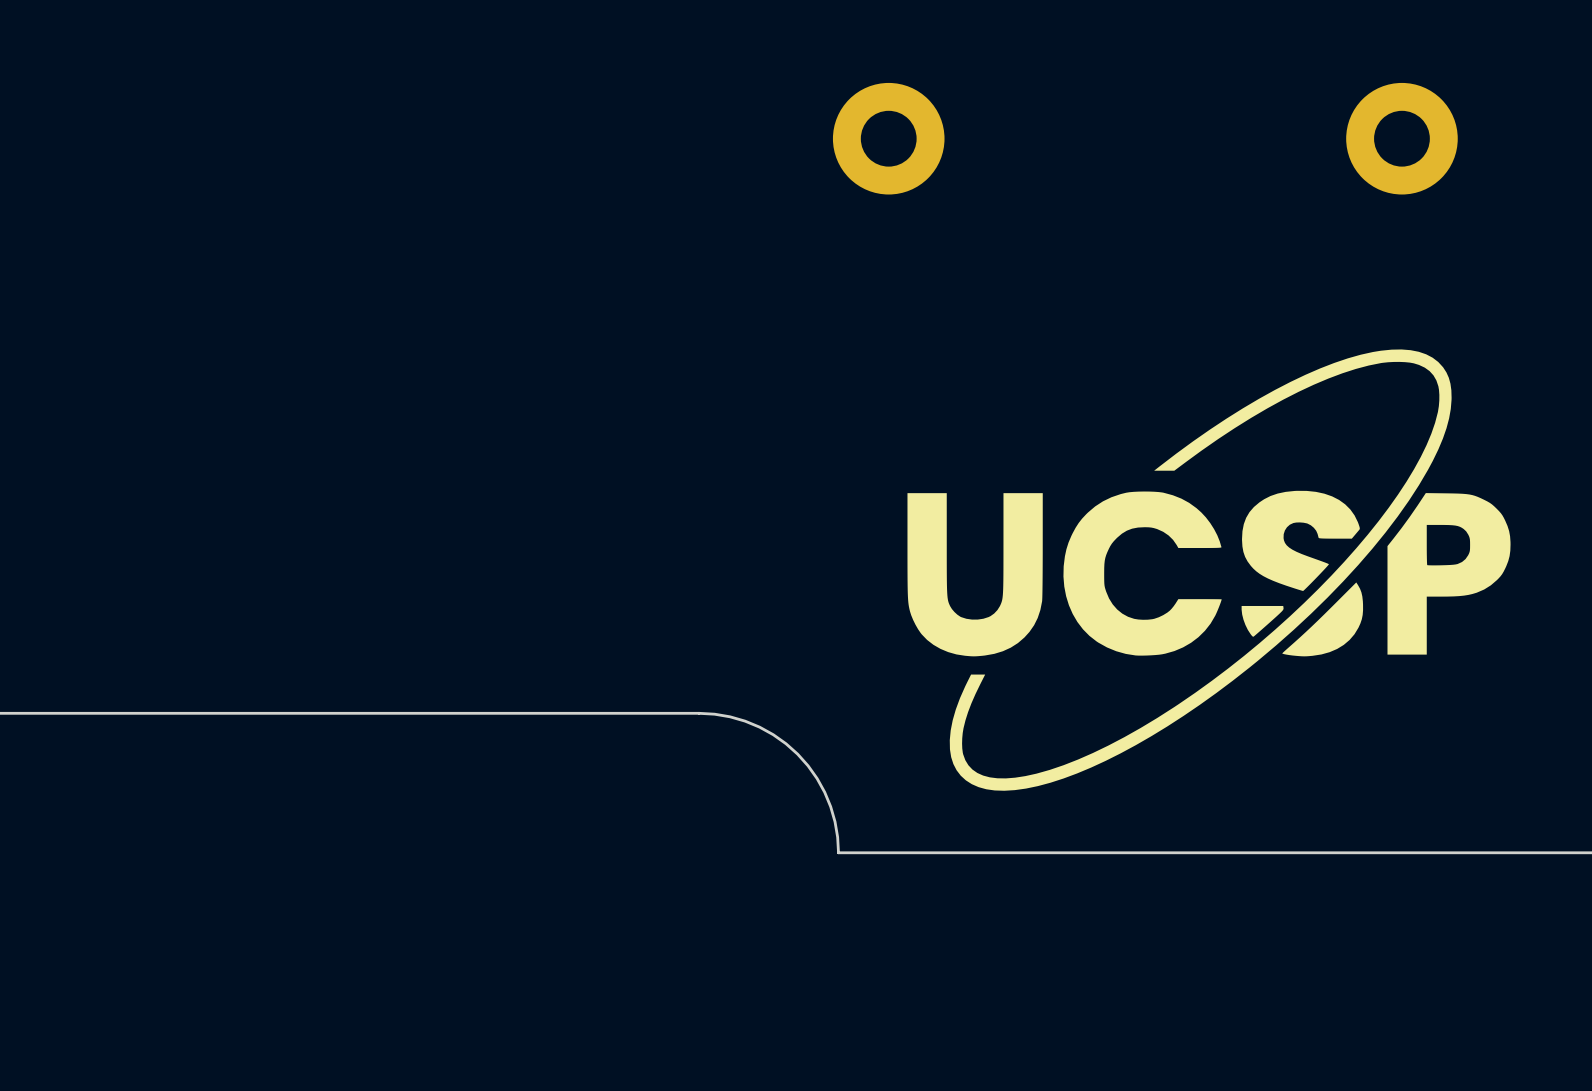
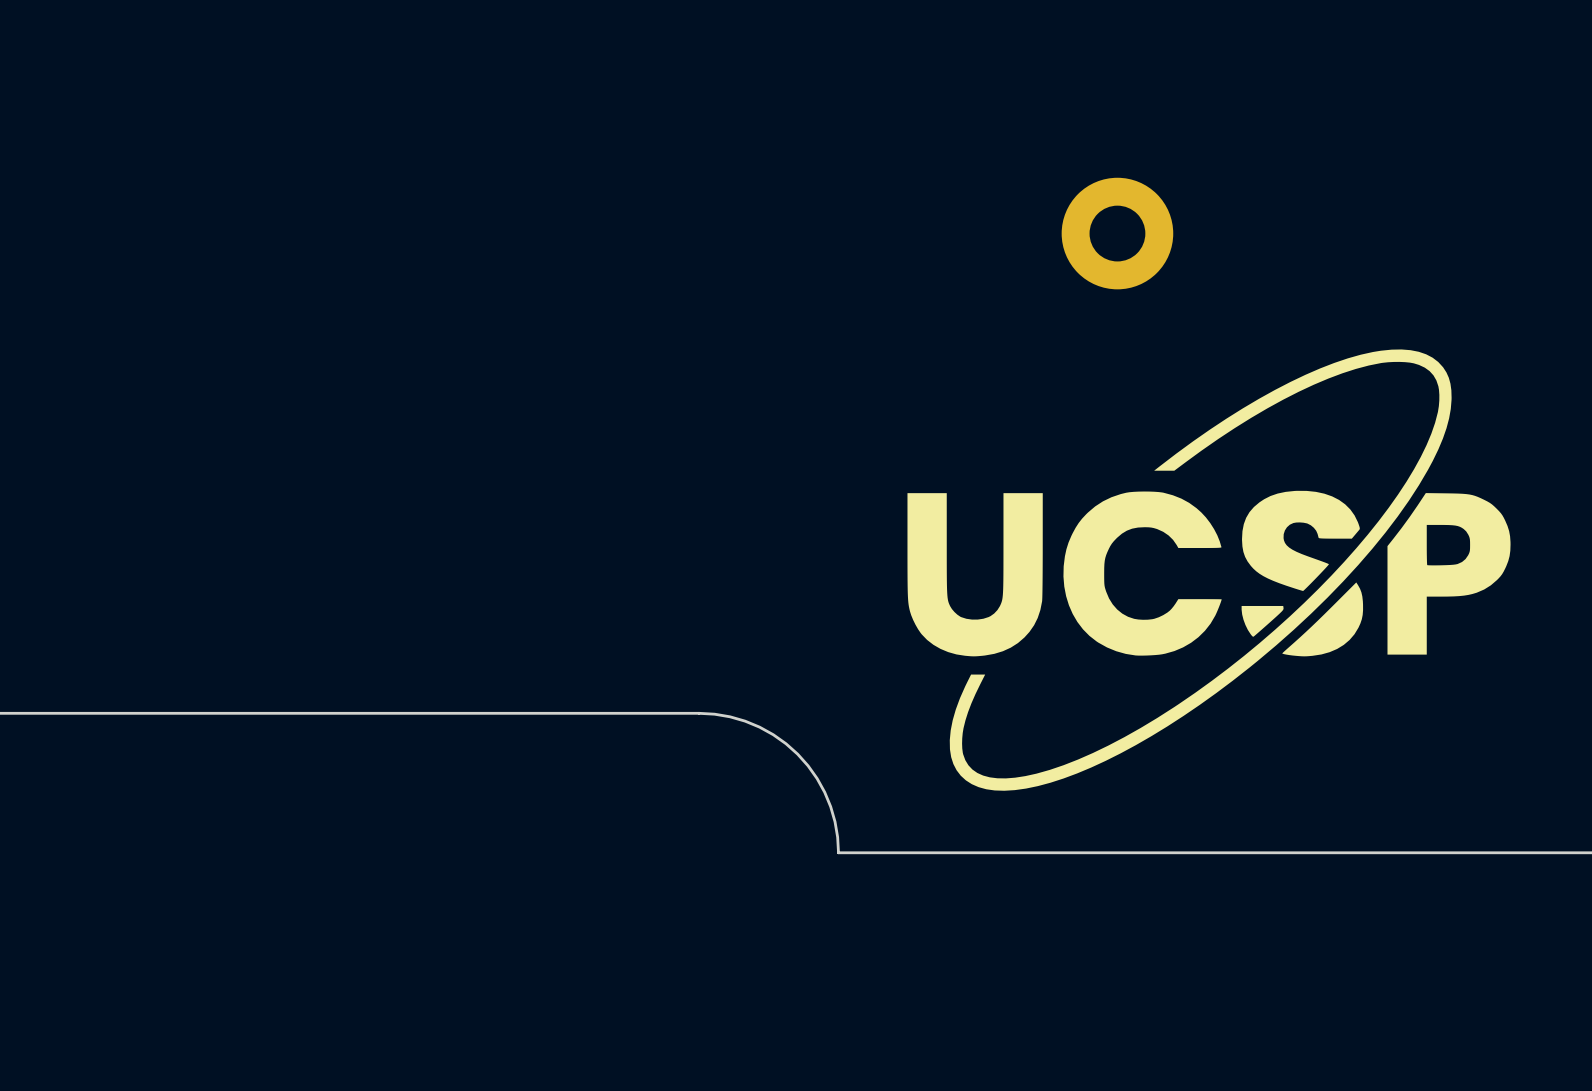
part: (888, 138) -> none
part: (1401, 138) -> none
part: none -> (1117, 233)

